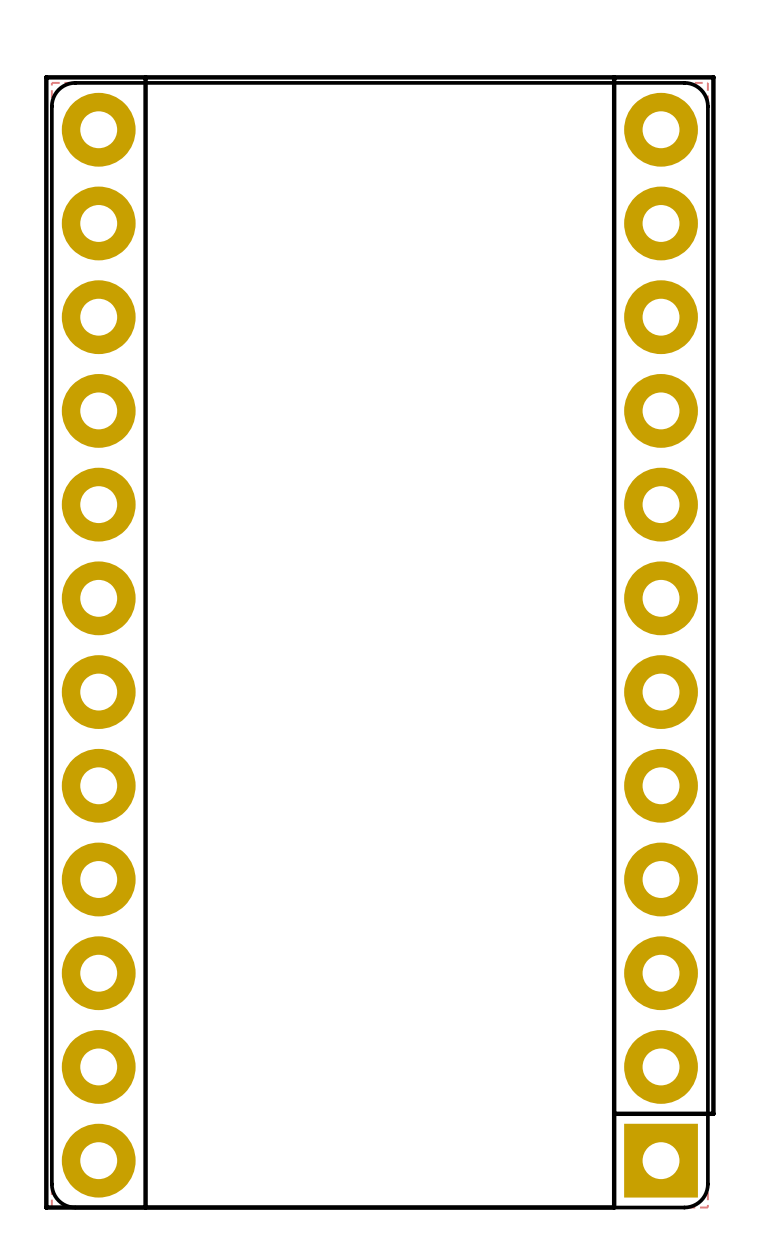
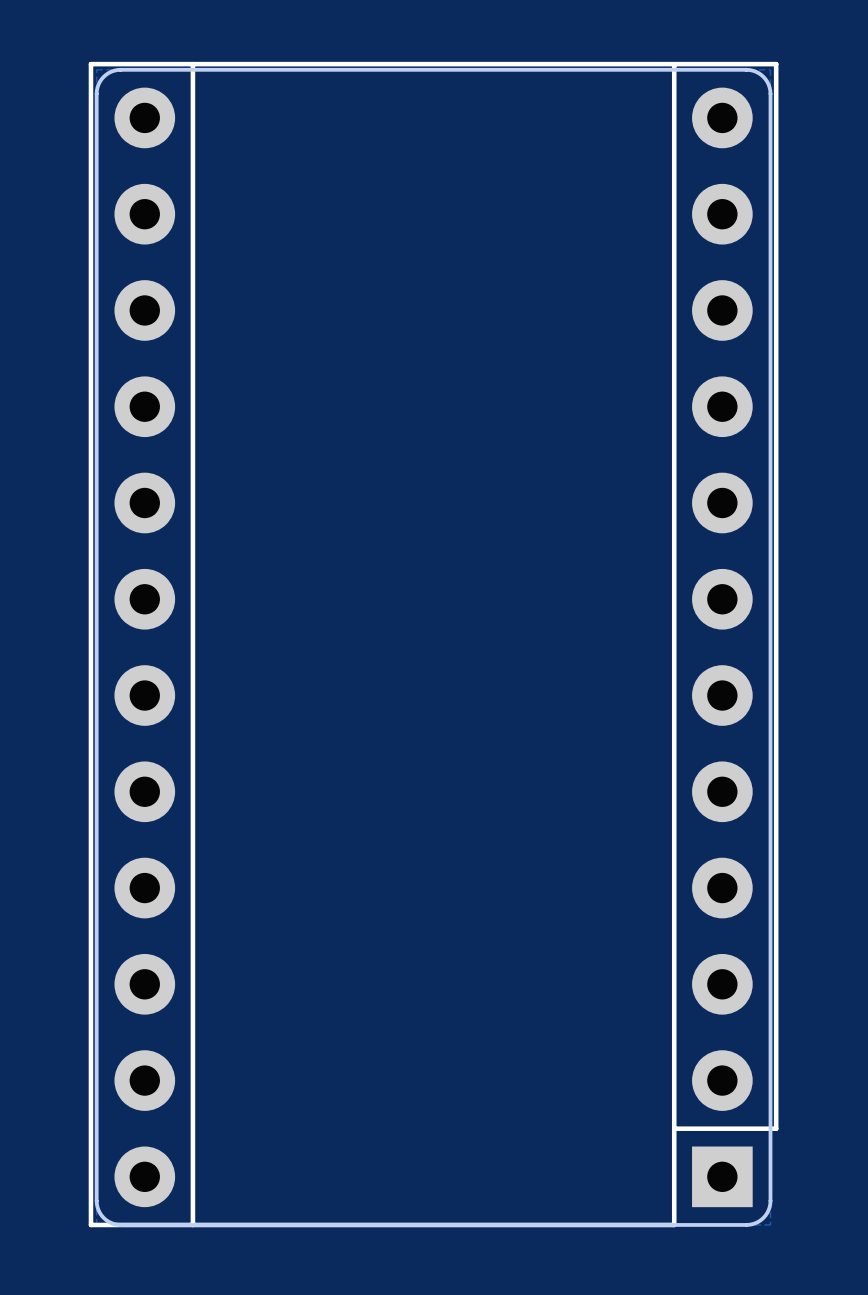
part footprint: [44, 75, 716, 1210] -> [88, 61, 779, 1228]

